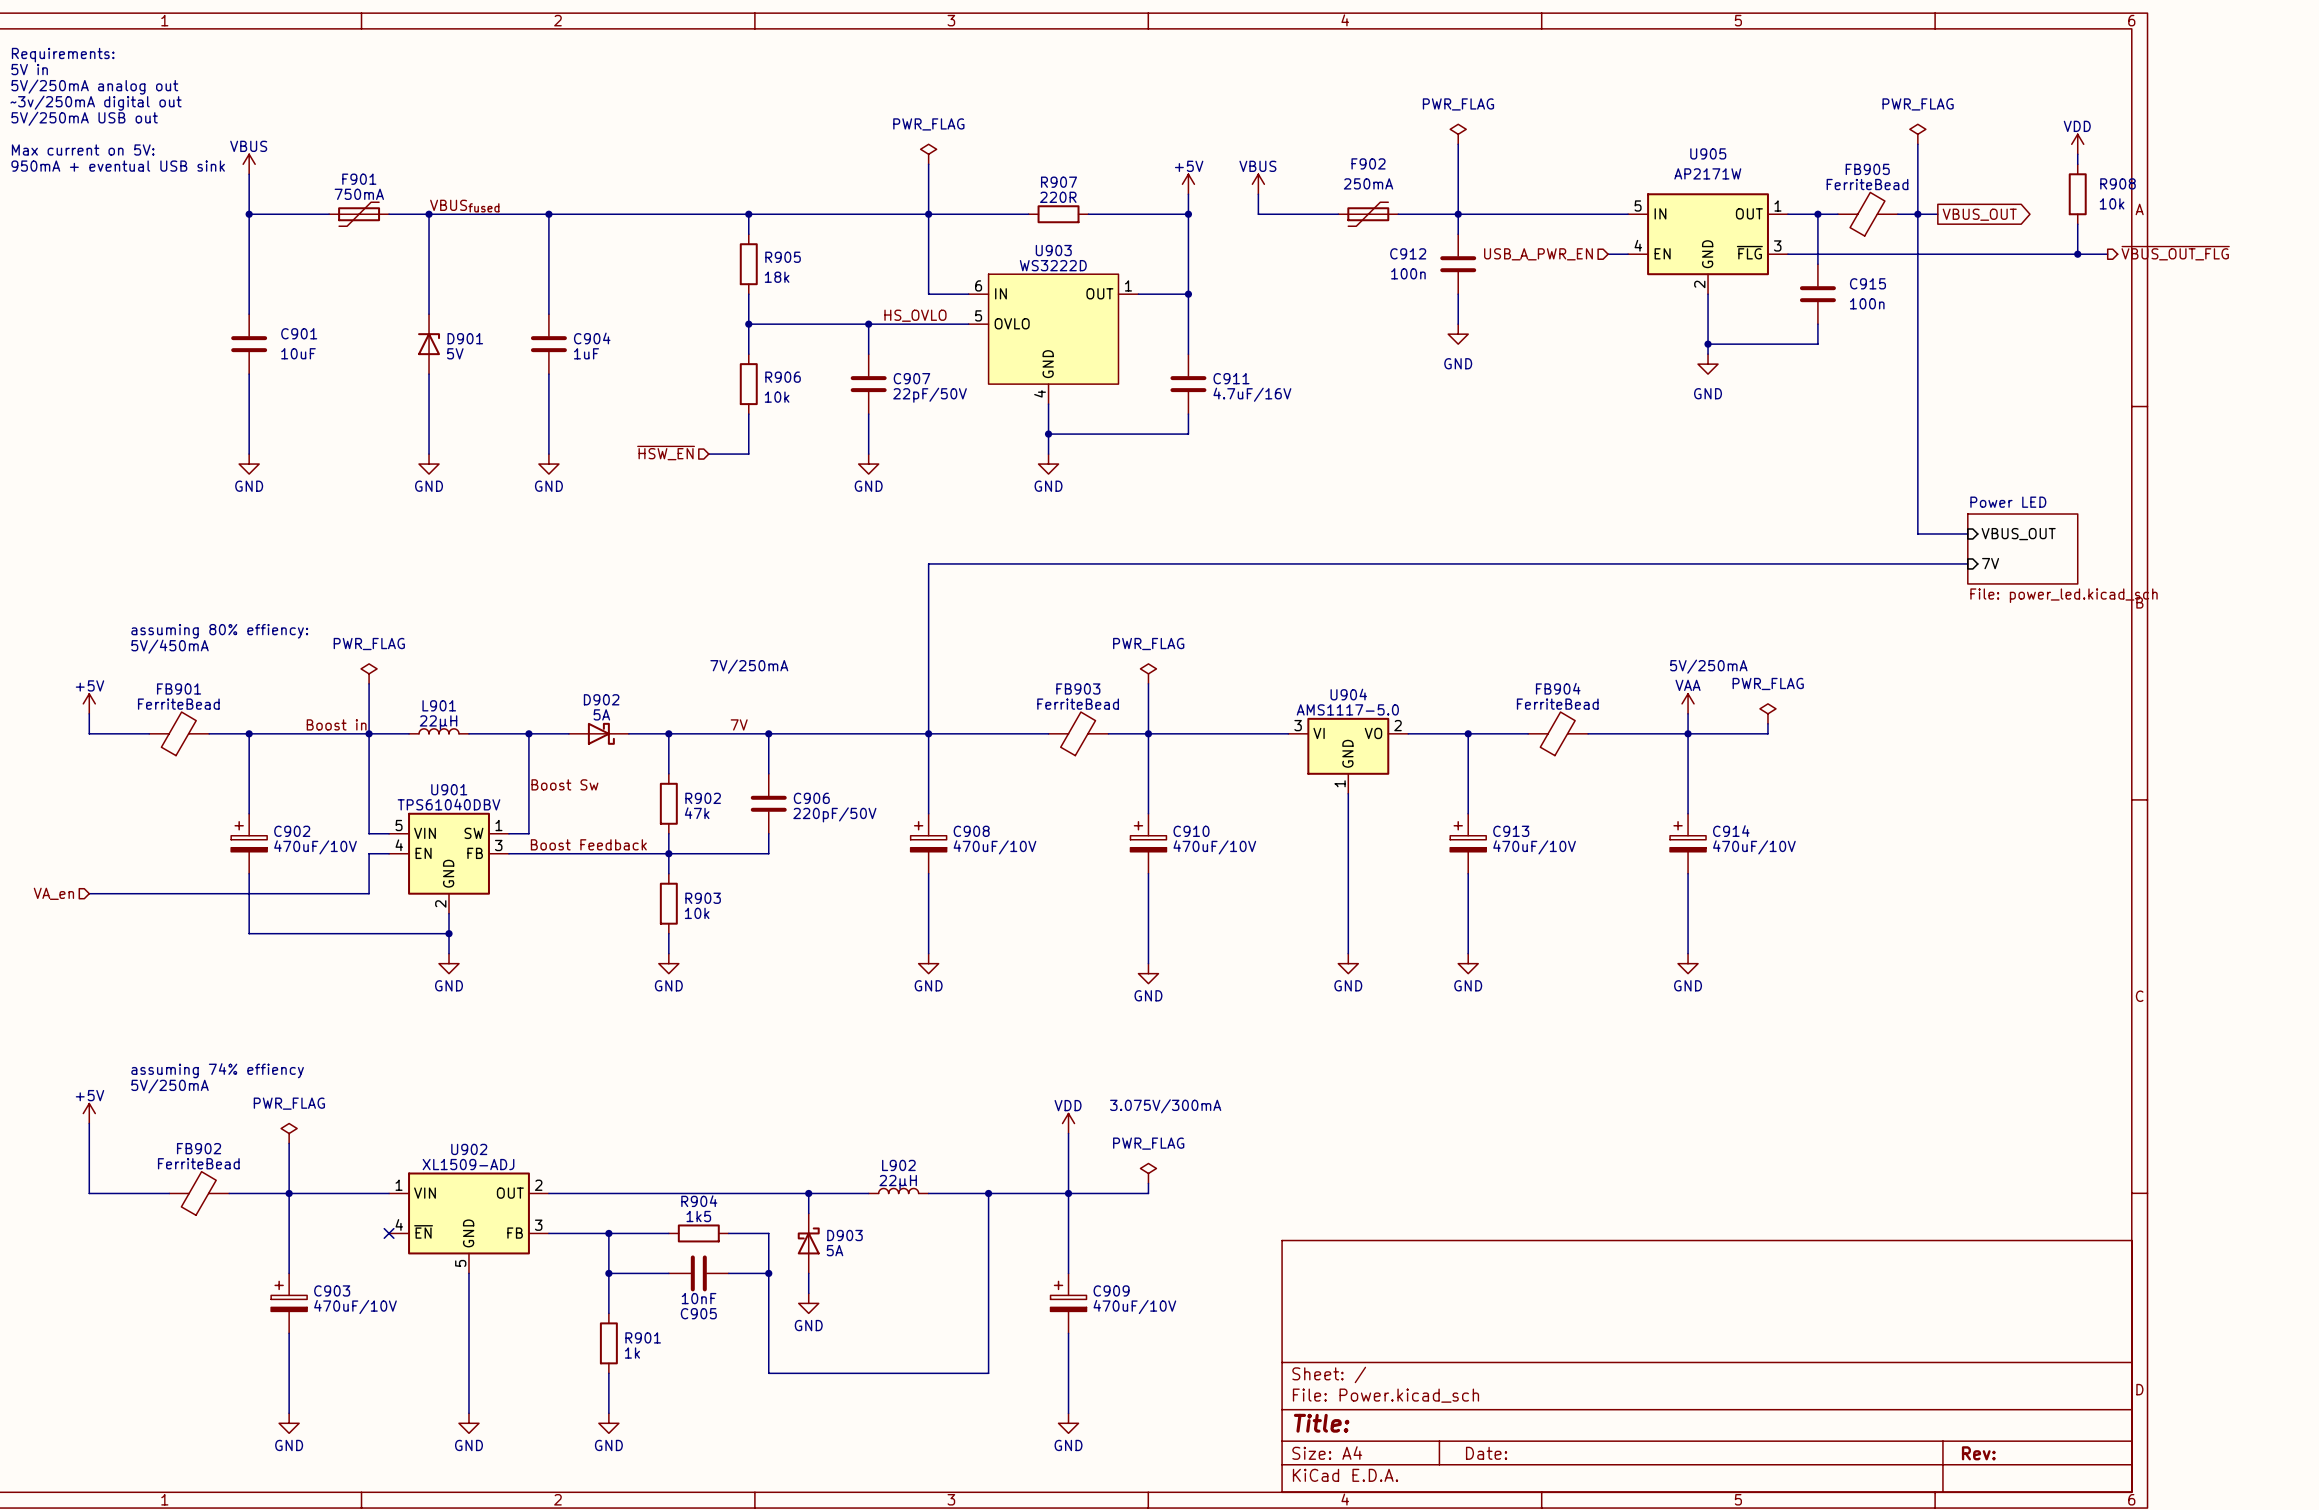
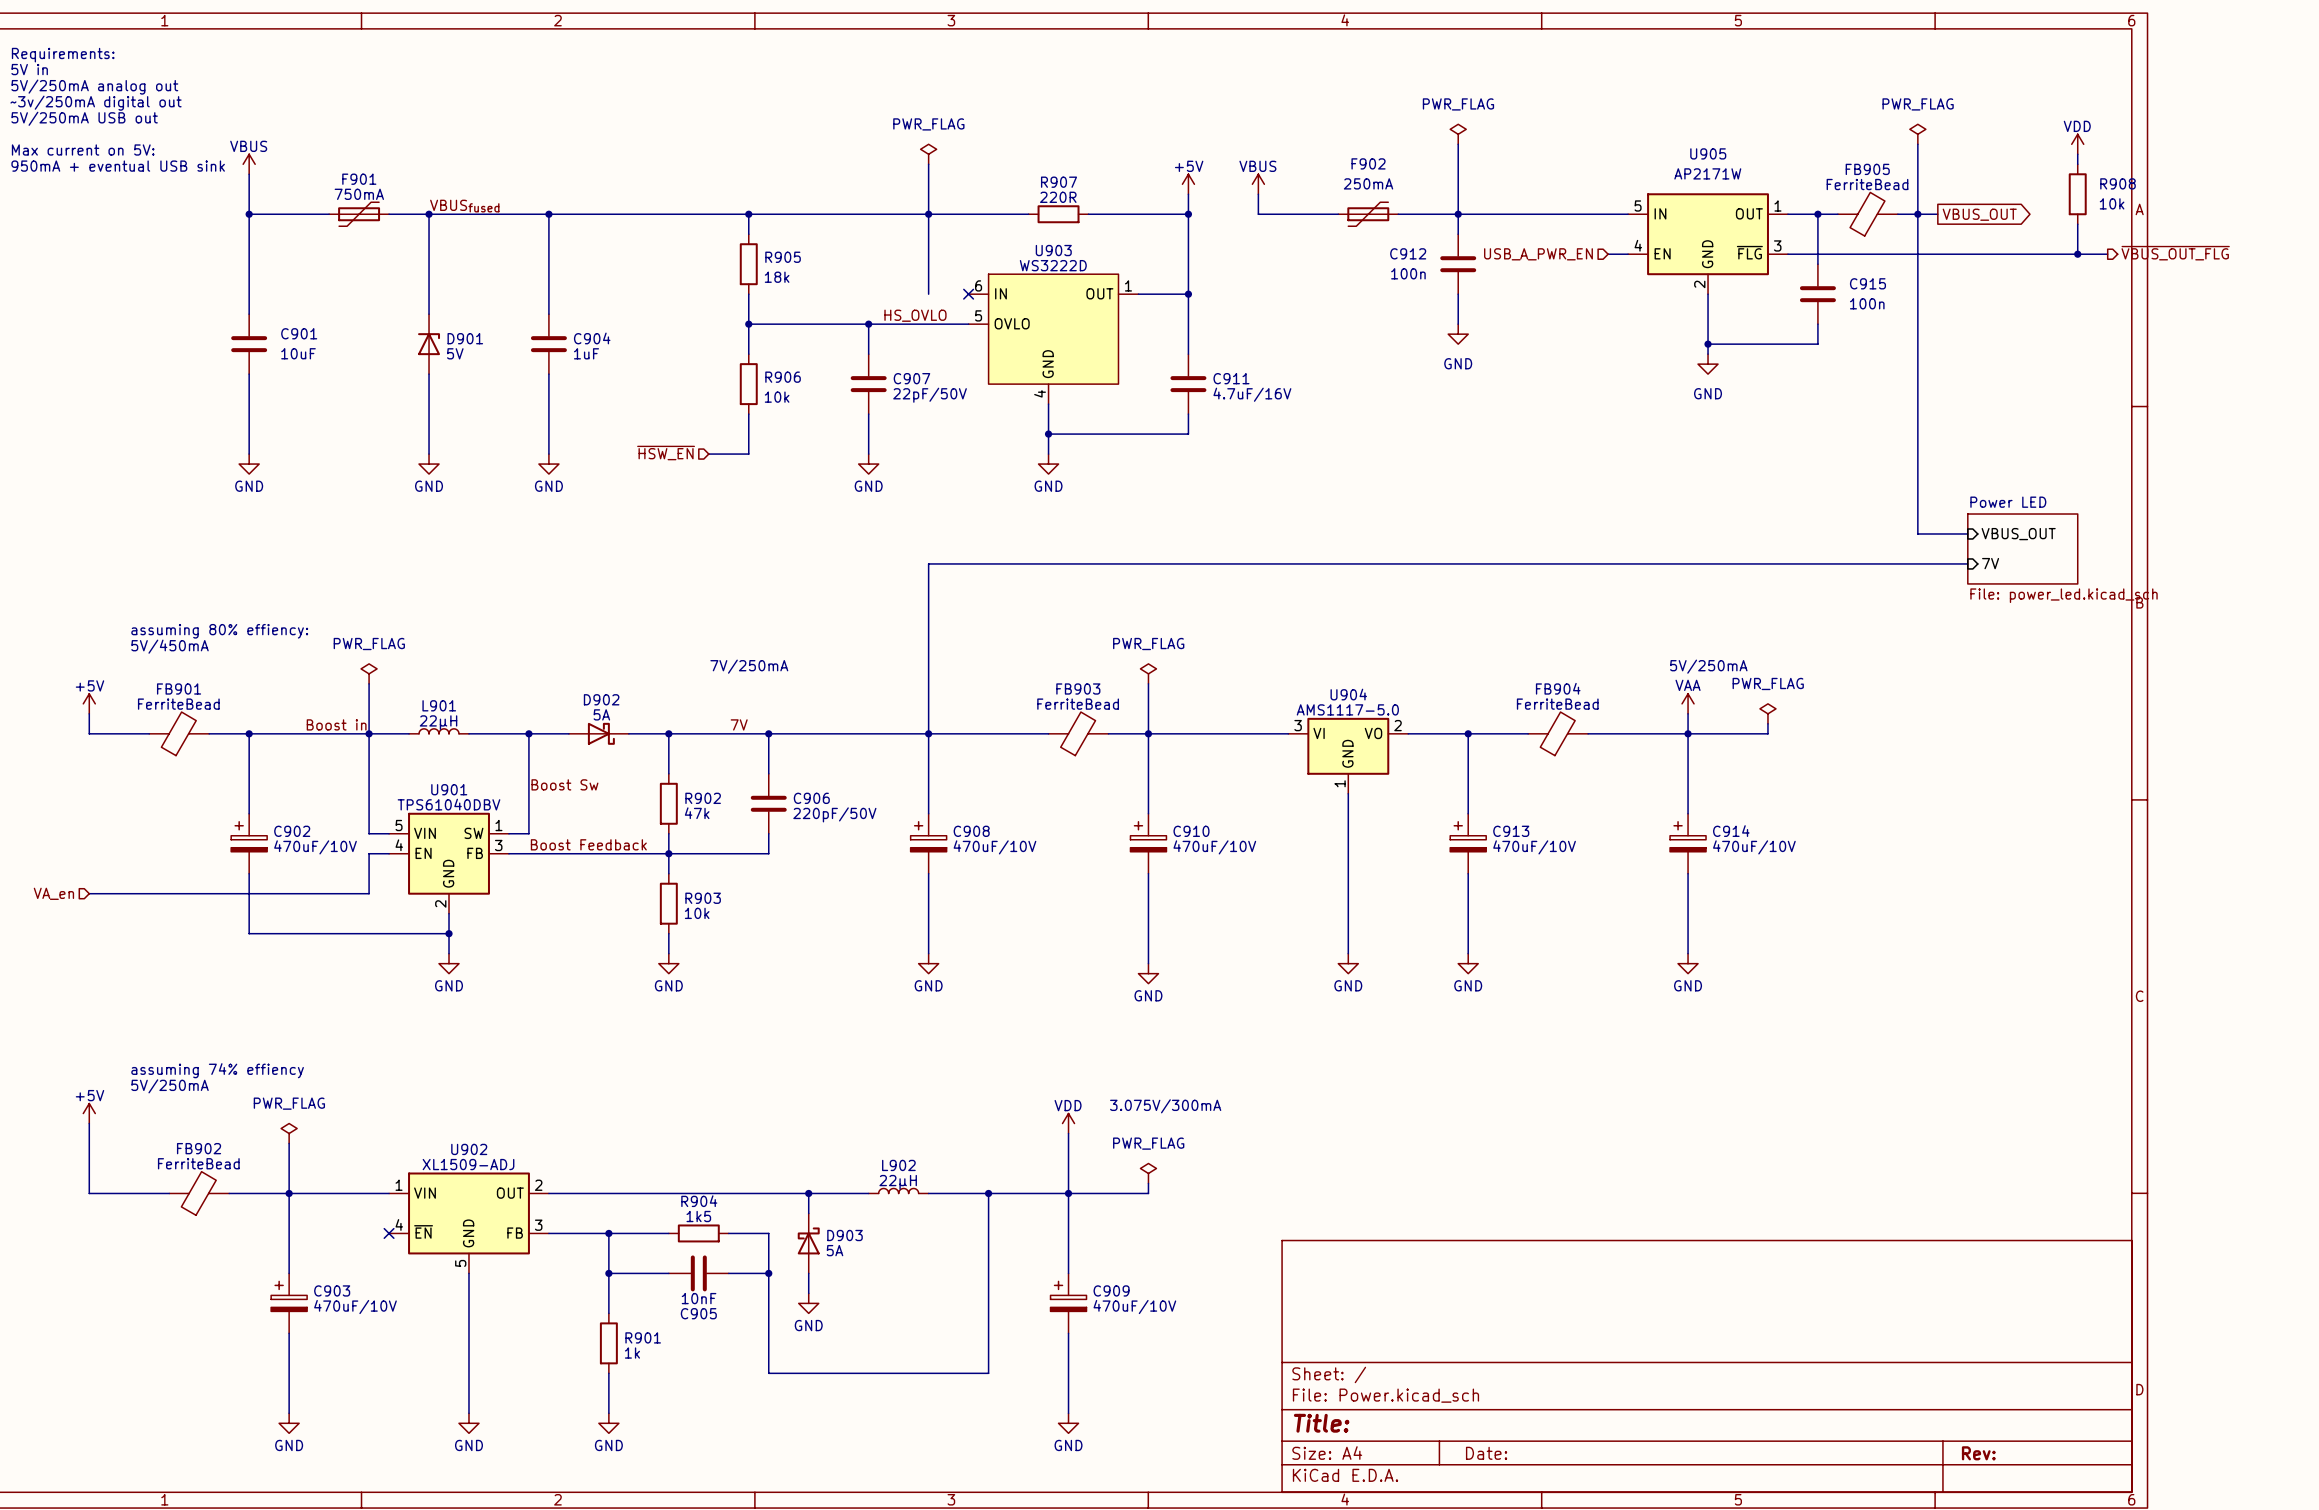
wire: (928, 294) (968, 294) -> none
no-connect mark: none -> (968, 294)

